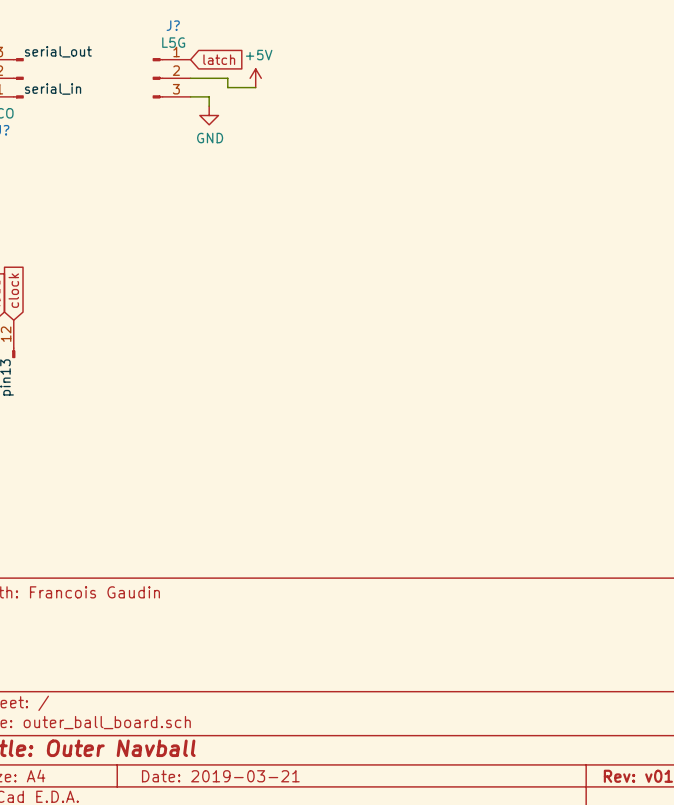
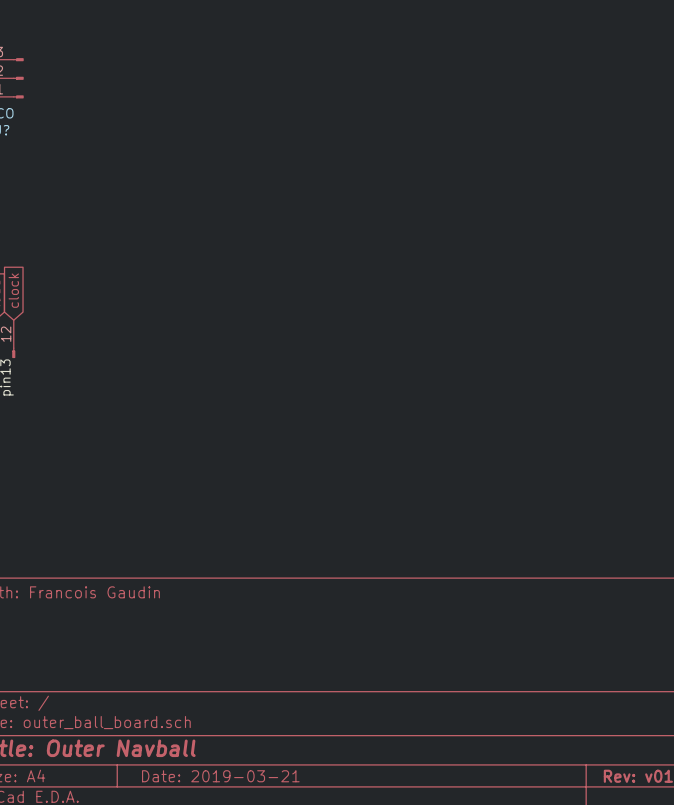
label: serial_out (58, 51) -> none
global label: latch (219, 59) -> none
J?: L5G (171, 78) -> none
wire: (190, 78) (227, 78) (227, 87) (255, 87) -> none
power symbol: +5V (255, 78) -> none
label: serial_in (53, 89) -> none
wire: (190, 96) (209, 96) (209, 106) -> none
power symbol: GND (209, 115) -> none

